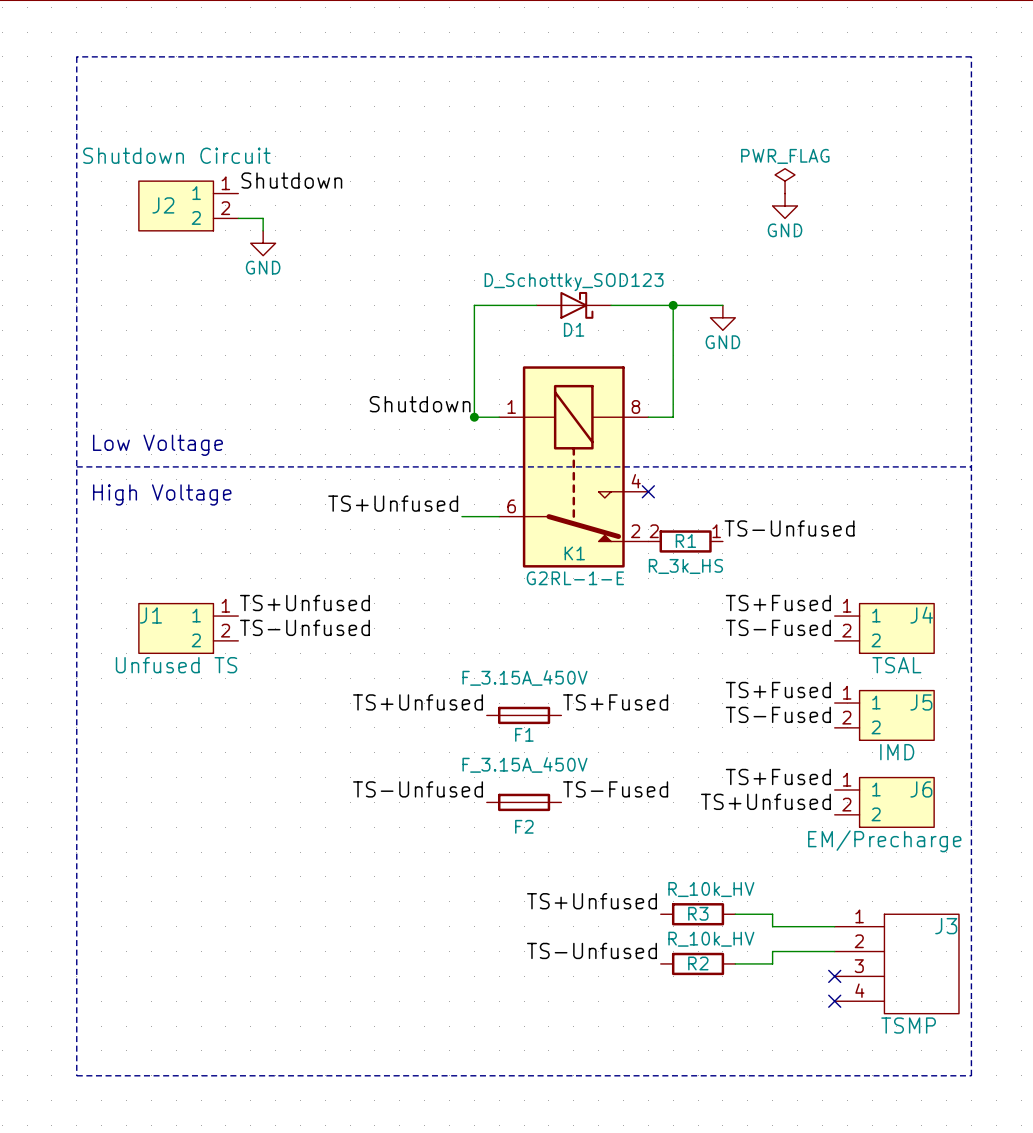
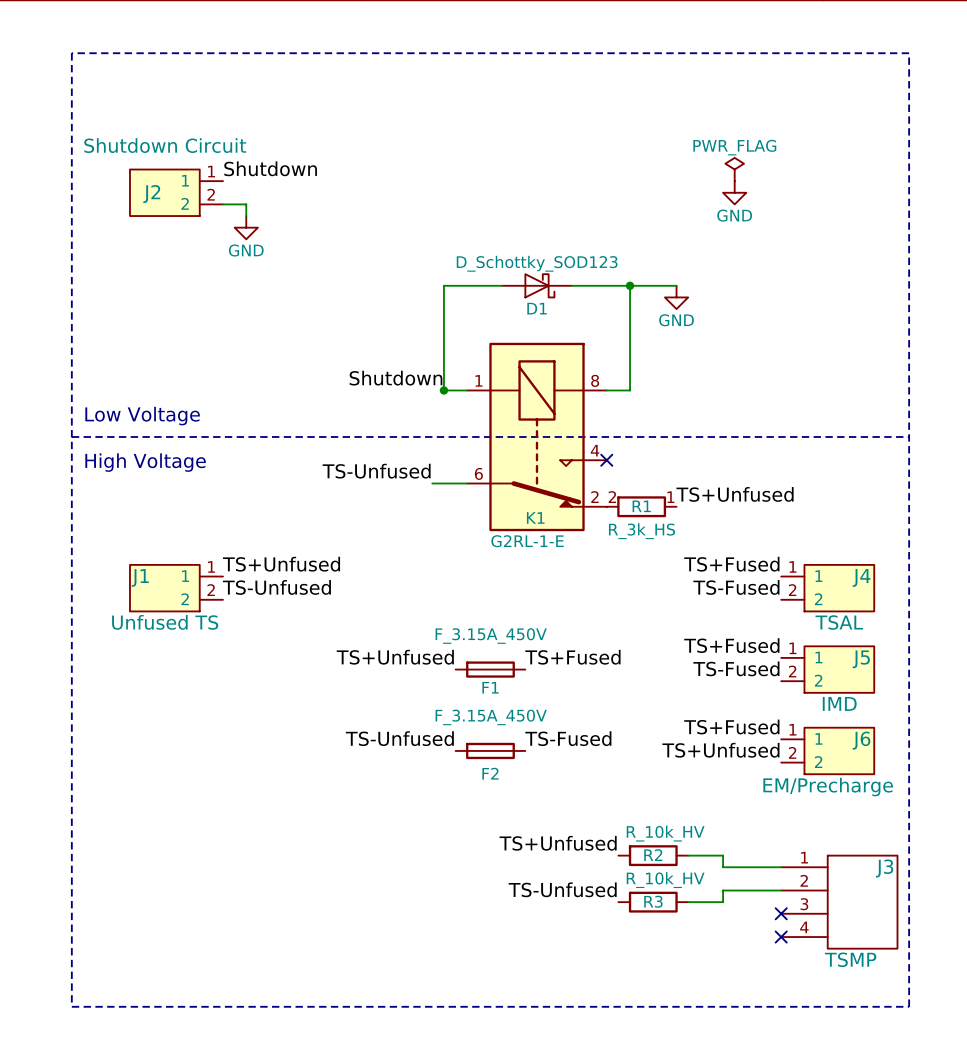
label: TS+Unfused (393, 503) -> TS-Unfused (376, 471)
label: TS-Unfused (789, 528) -> TS+Unfused (735, 494)
R3 name: R3 (698, 913) -> R2 (653, 855)
R2 name: R2 (698, 963) -> R3 (653, 901)

